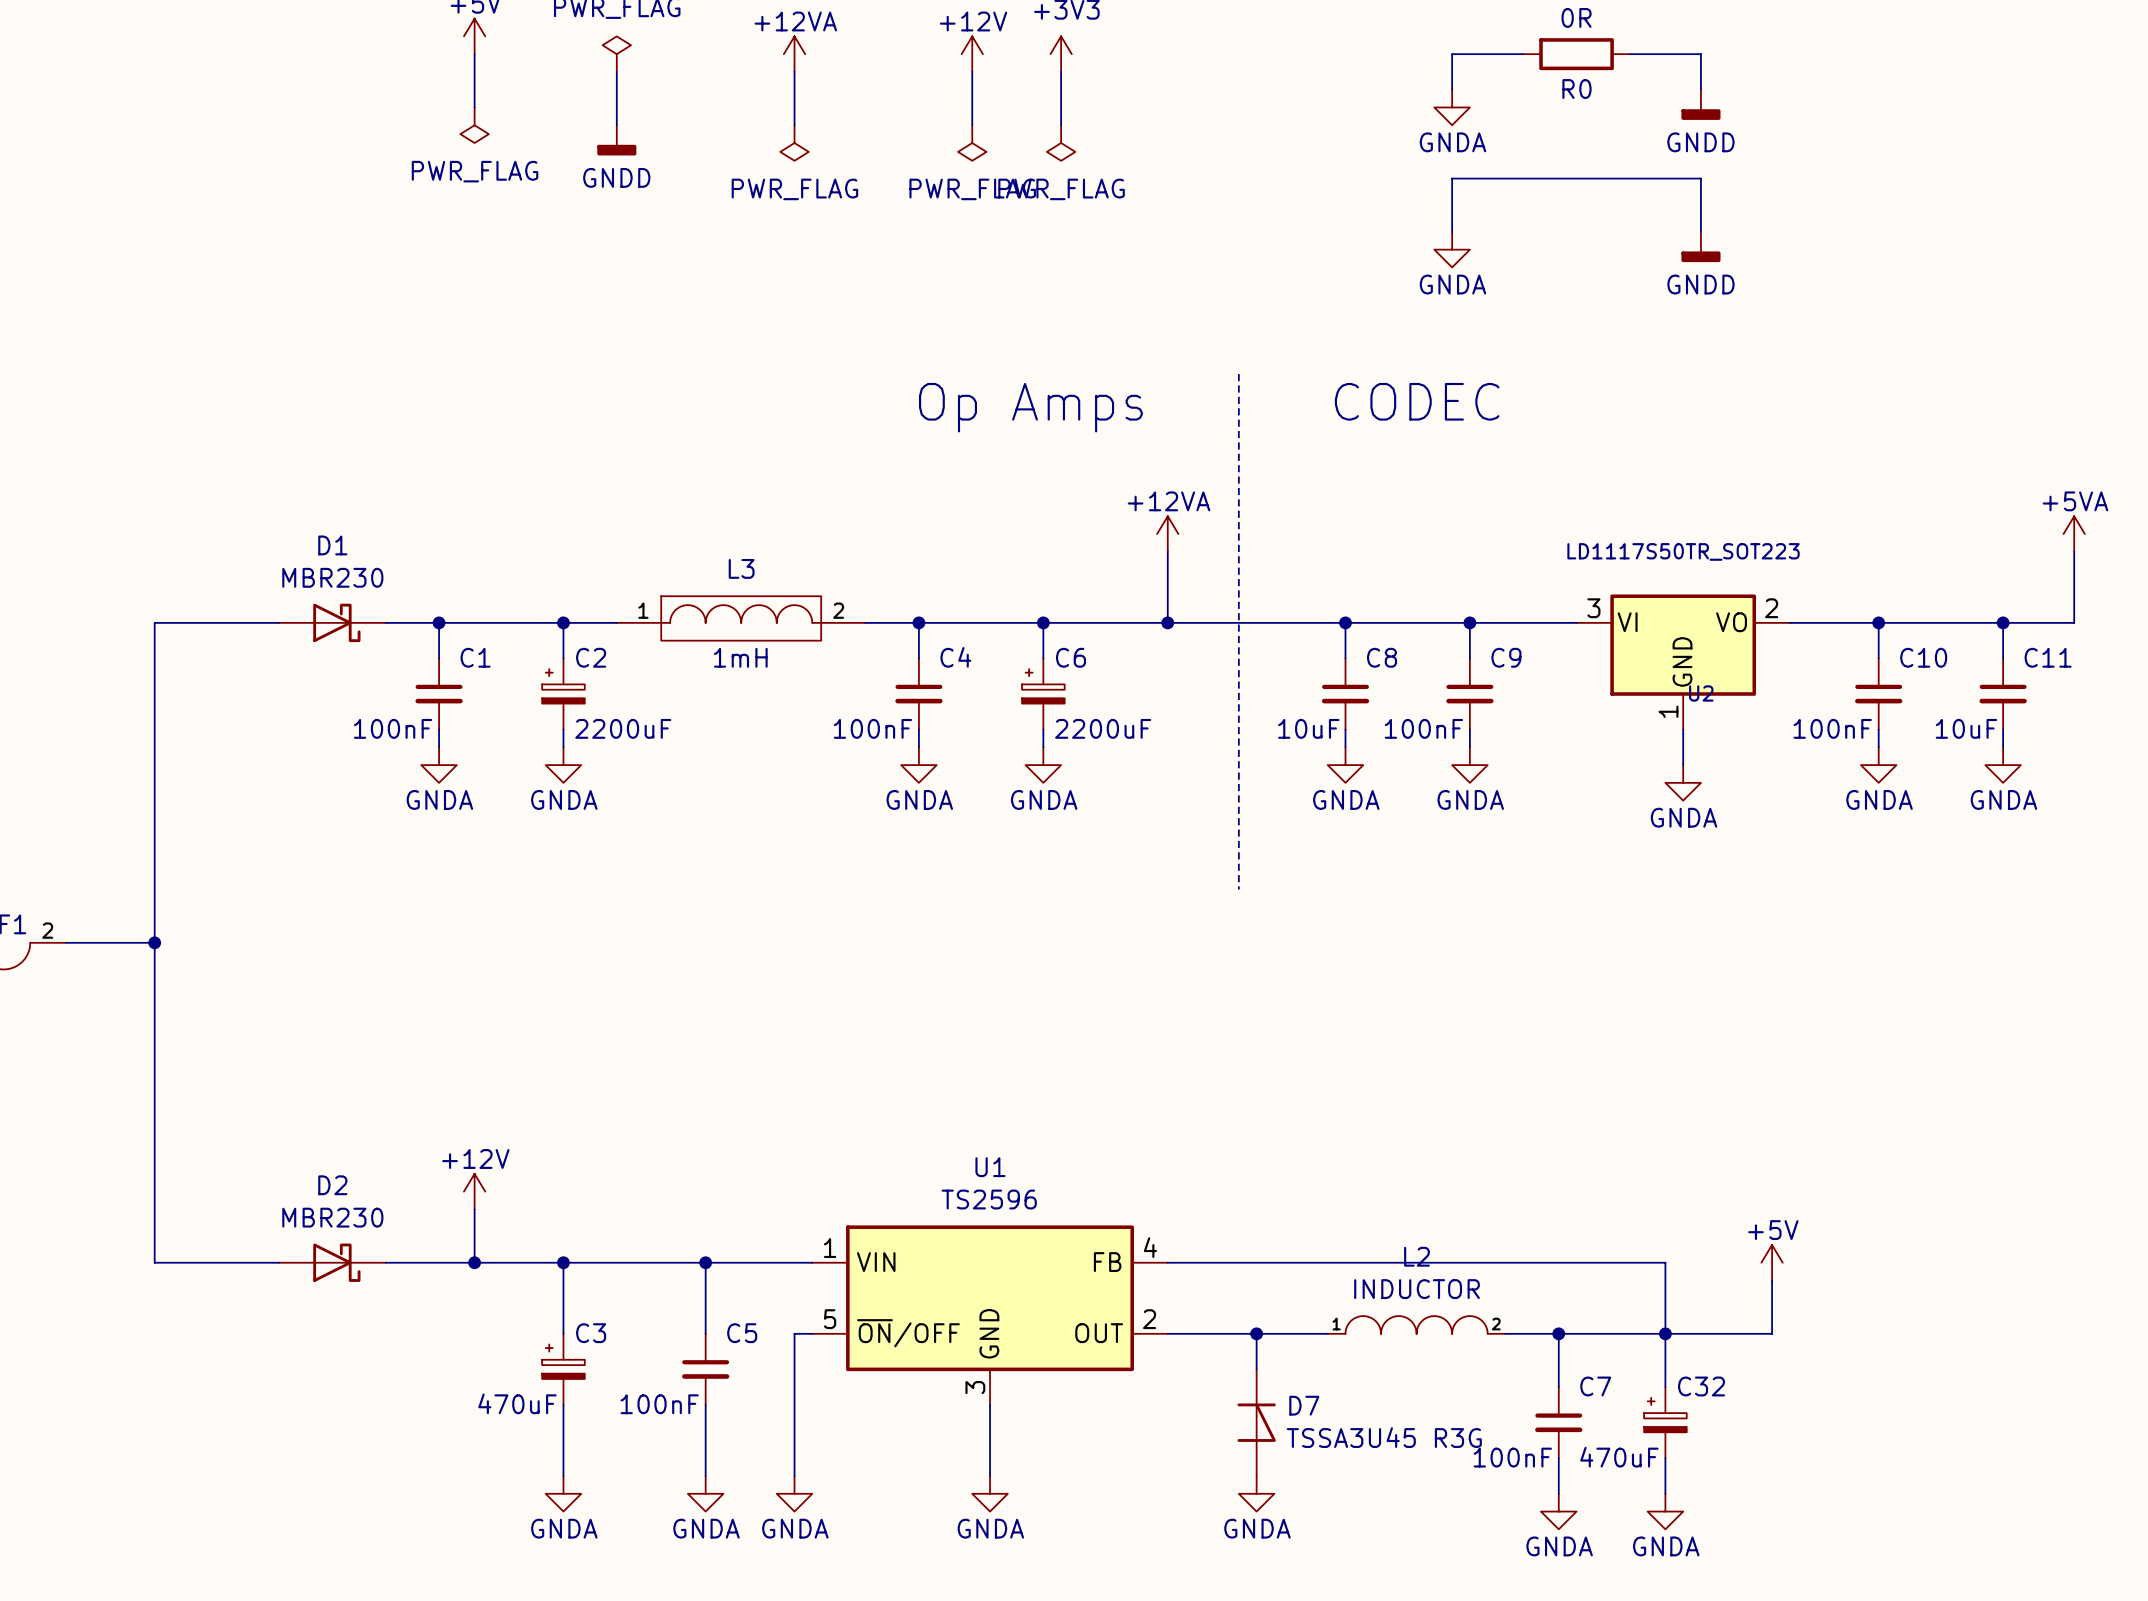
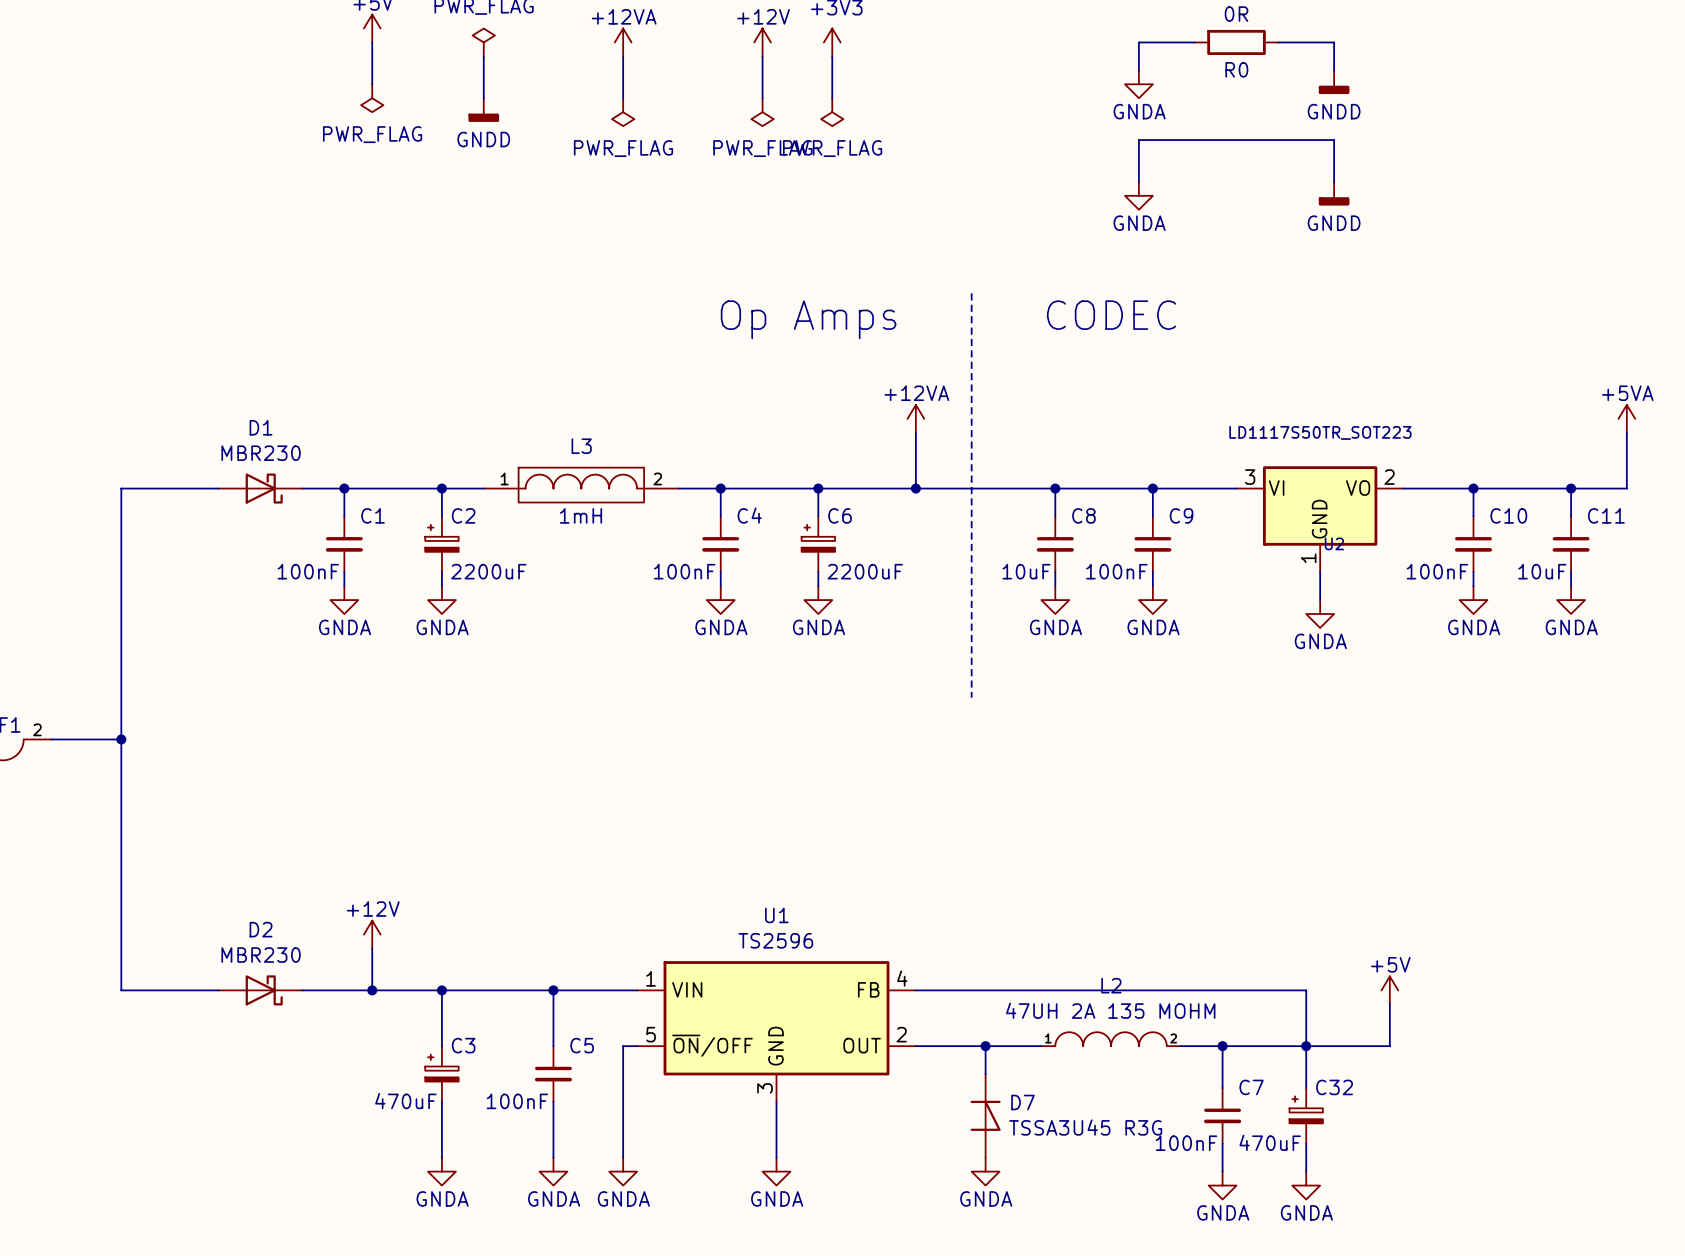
L2 value: INDUCTOR (1417, 1289) -> 47UH 2A 135 MOHM (1110, 1010)

